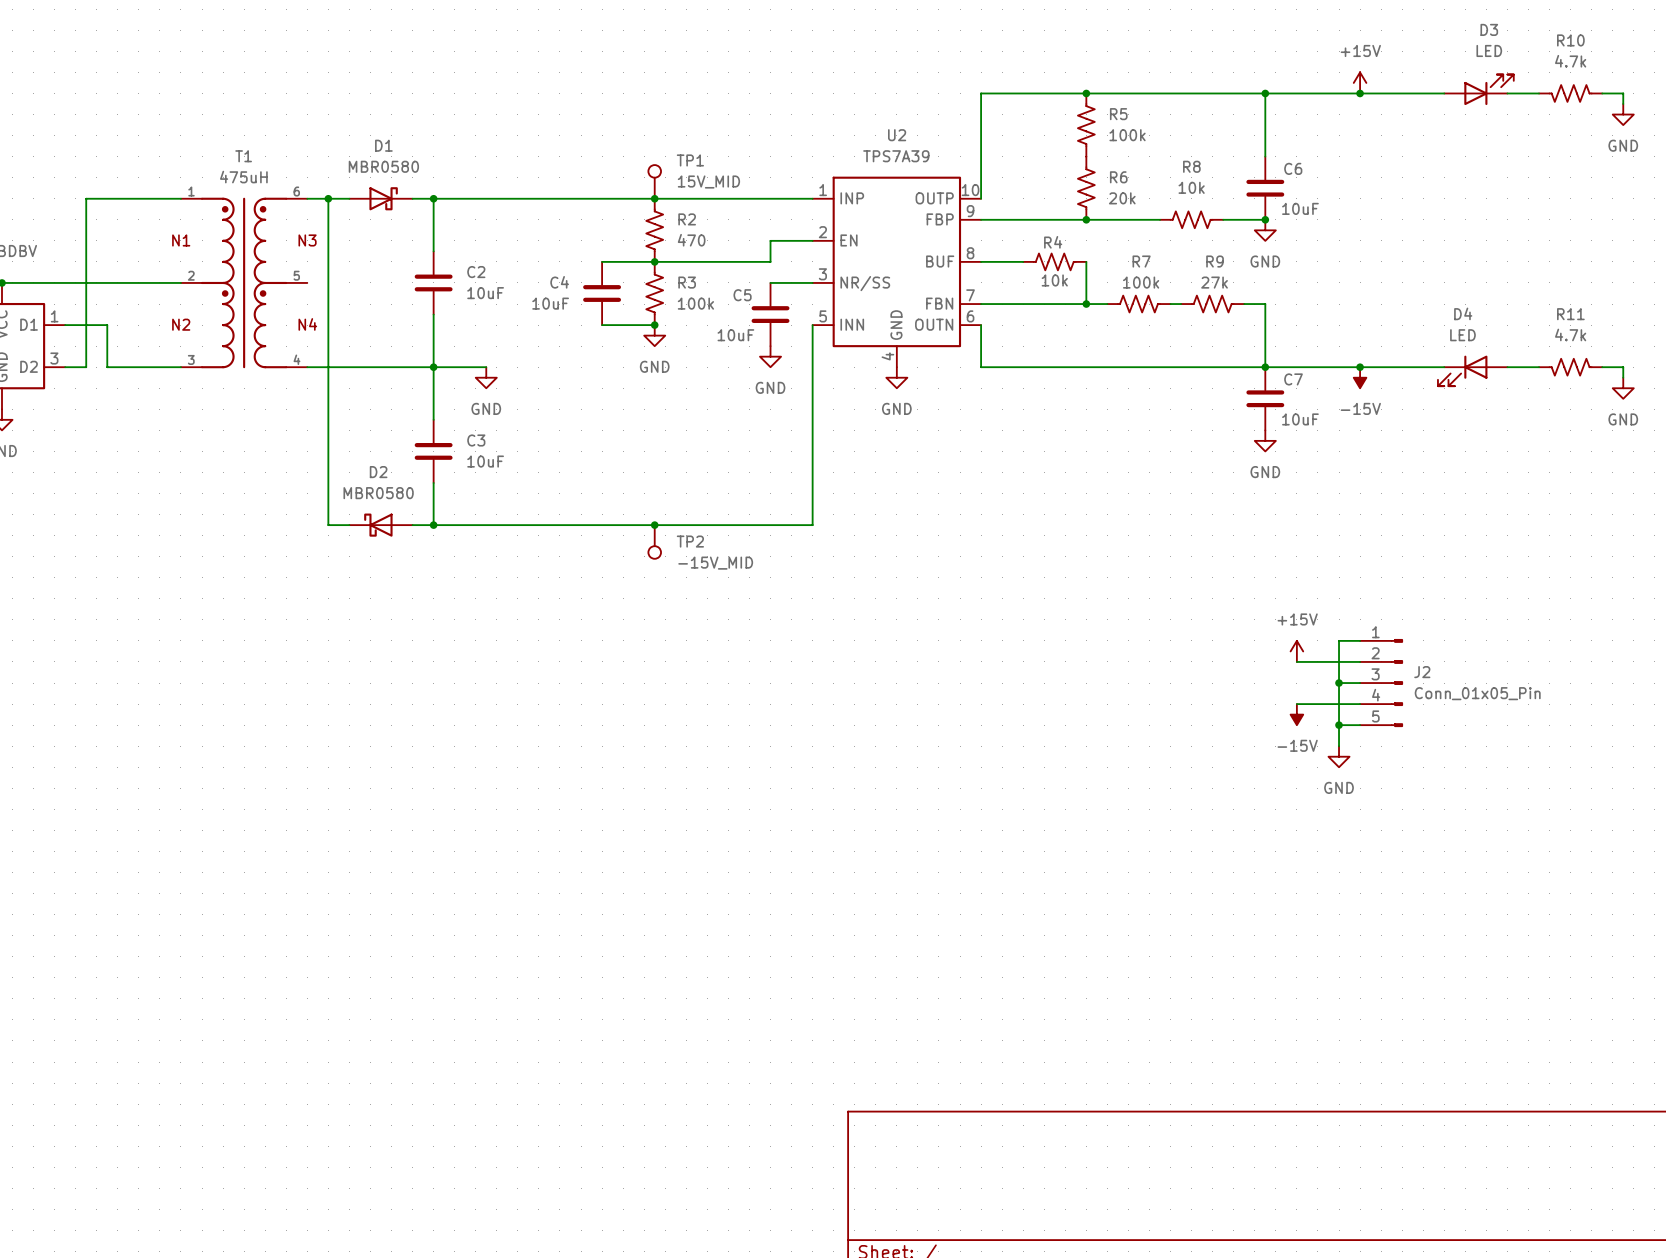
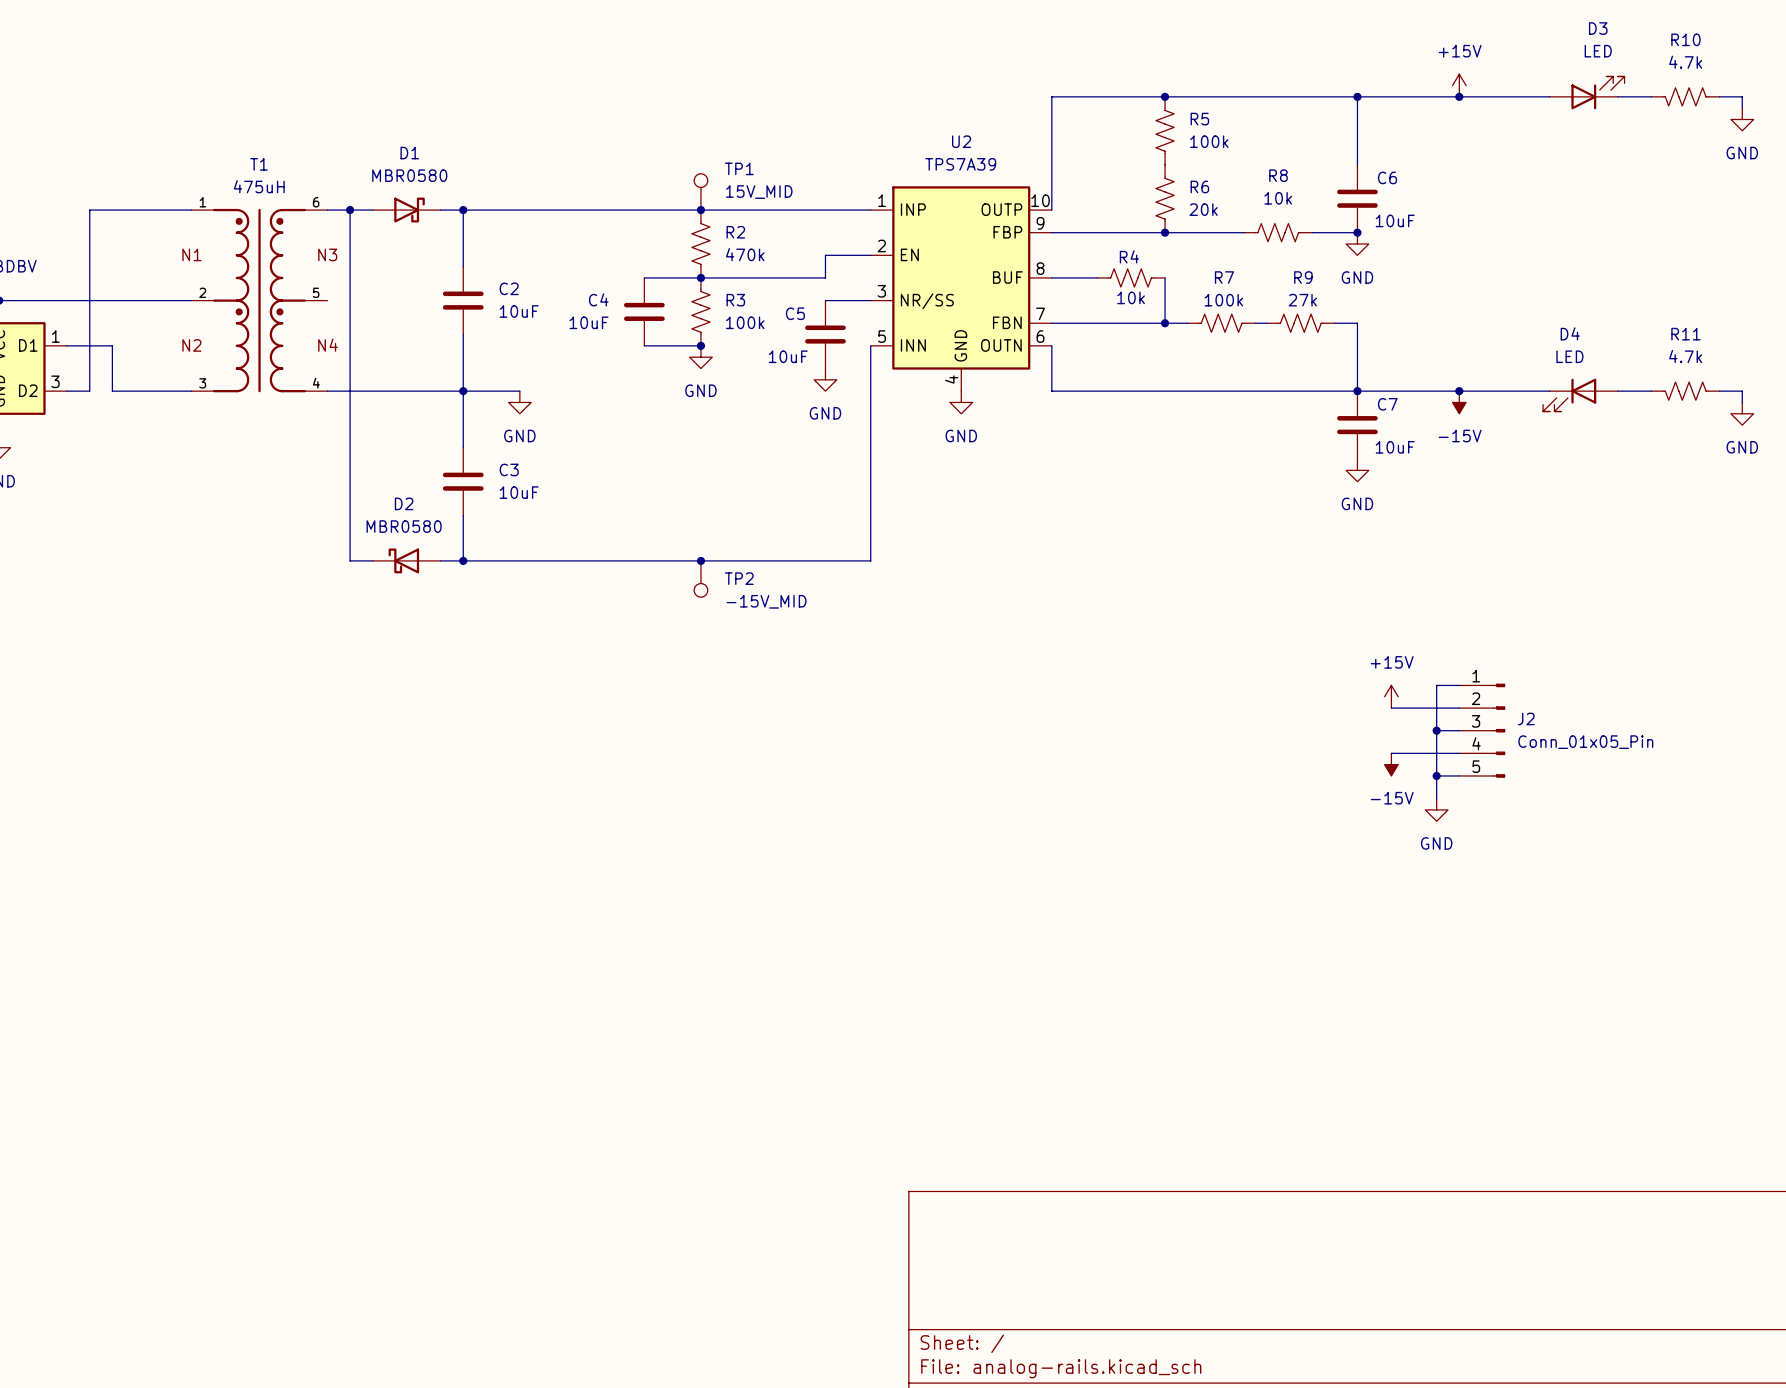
R2 value: 470 (691, 240) -> 470k (745, 254)

